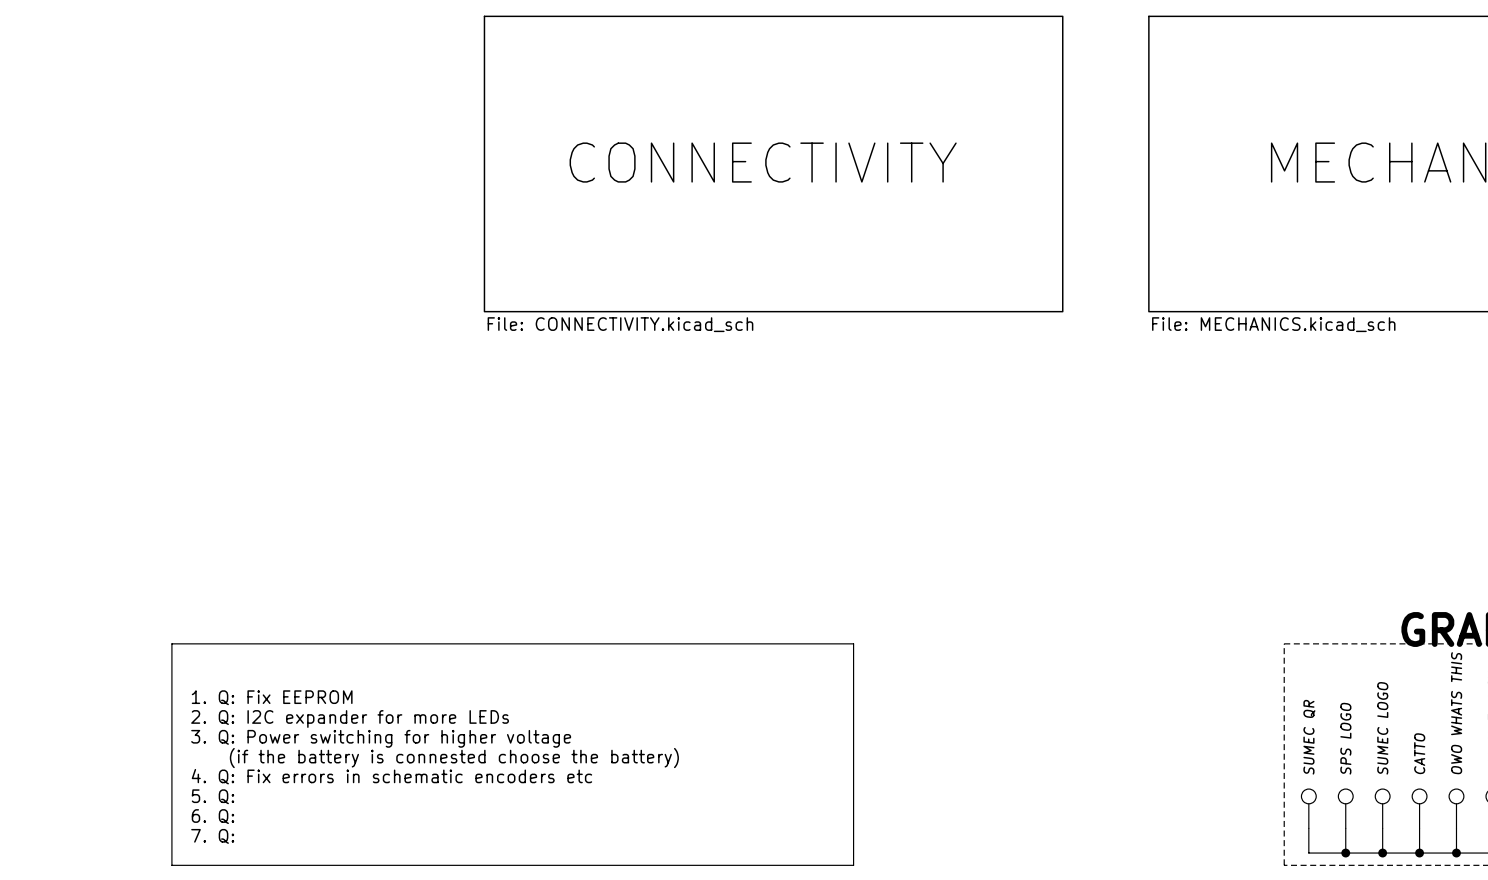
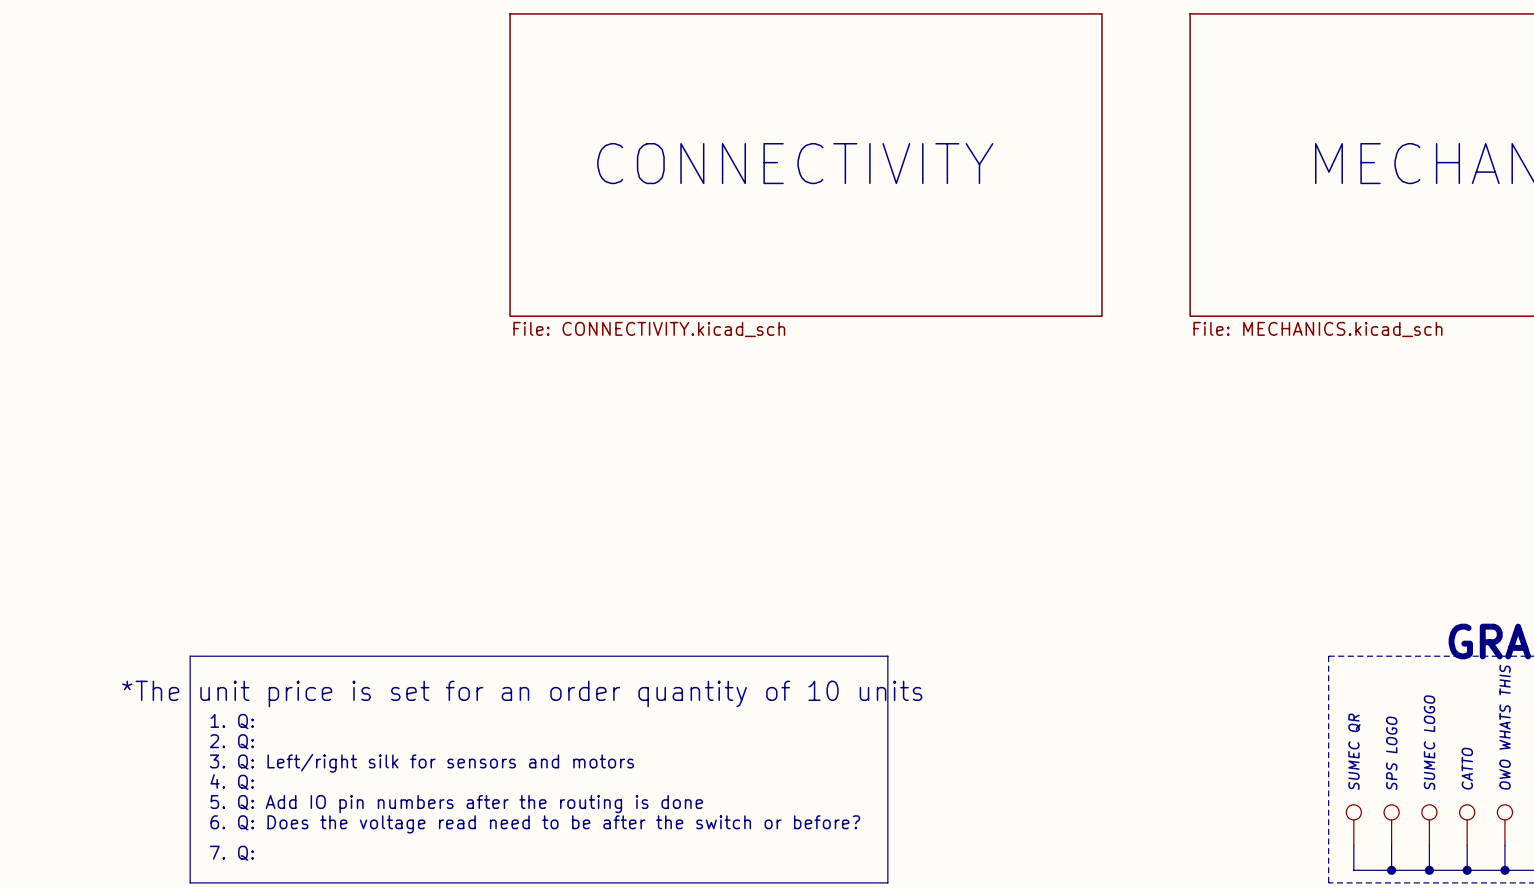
text: none -> *The unit price is set for an order quantity of 10 units (522, 693)
text: 1. Q: Fix EEPROM (272, 697) -> none
text: none -> 1. Q: (232, 721)
text: 2. Q: I2C expander for more LEDs (350, 719) -> none
text: none -> 2. Q: (231, 741)
text: 3. Q: Power switching for higher voltage (381, 738) -> none
text: none -> 3. Q: Left/right silk for sensors and motors (421, 763)
text: (if the battery is connested choose the battery) (454, 758) -> none
text: none -> 4. Q: (232, 782)
text: 4. Q: Fix errors in schematic encoders etc (391, 776) -> none
text: none -> 5. Q: Add IO pin numbers after the routing is done (456, 804)
text: 5. Q: (212, 796) -> none
text: none -> 6. Q: Does the voltage read need to be after the switch or before? (535, 824)
text: 6. Q: (212, 816) -> none

